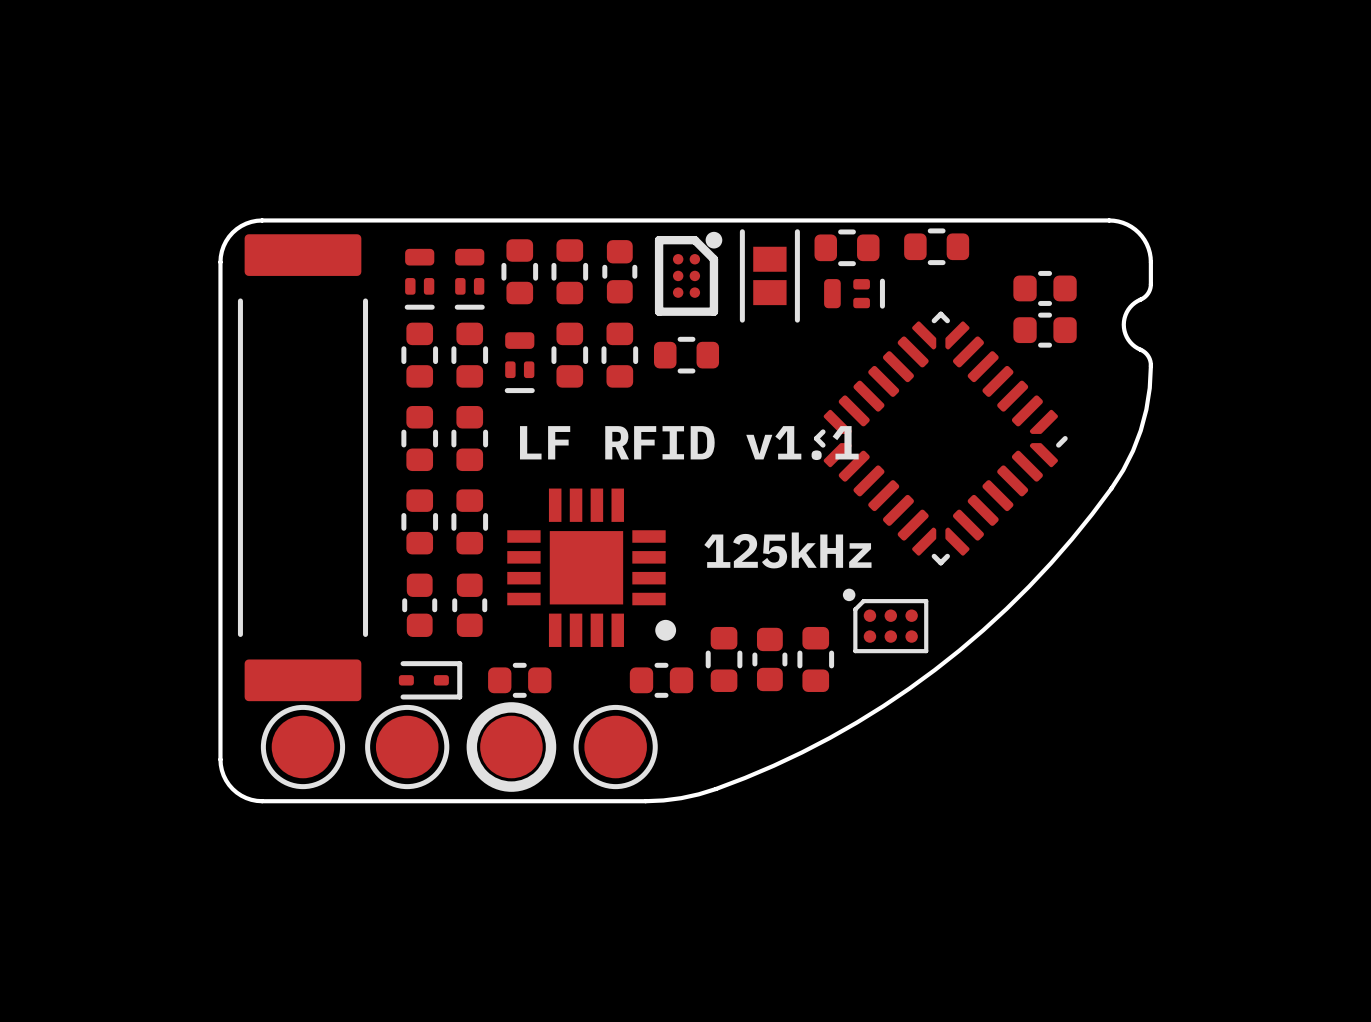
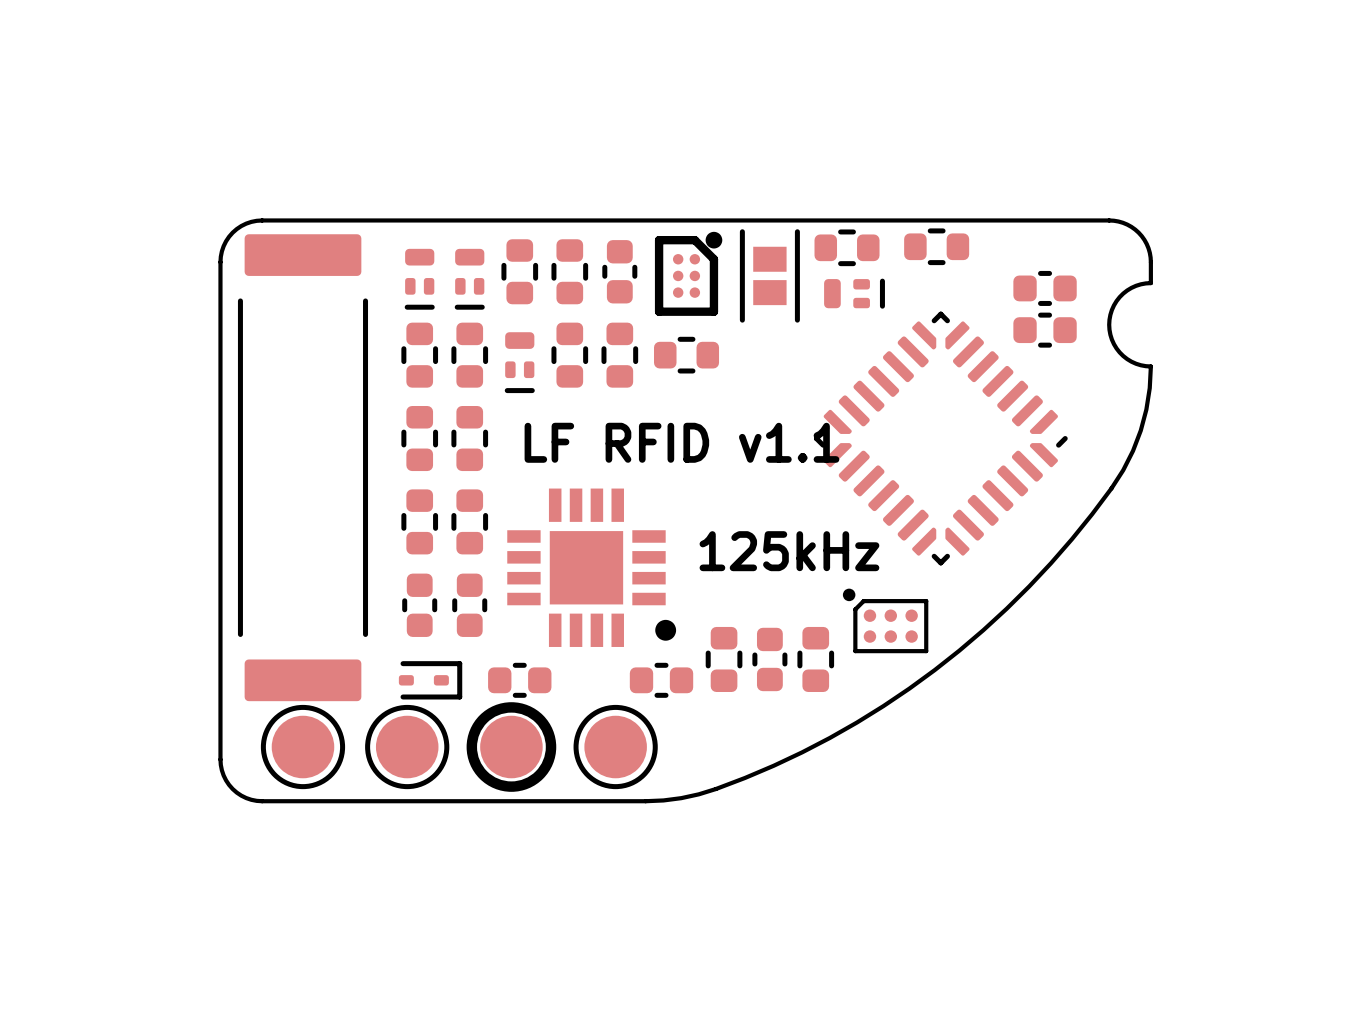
drawing shape: [218, 218, 1153, 804] -> [218, 218, 1153, 804]

